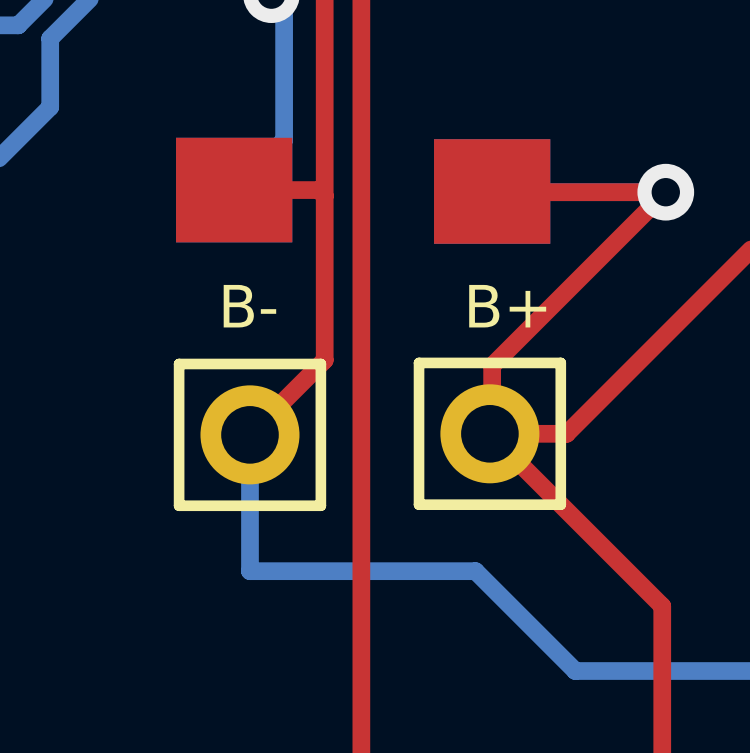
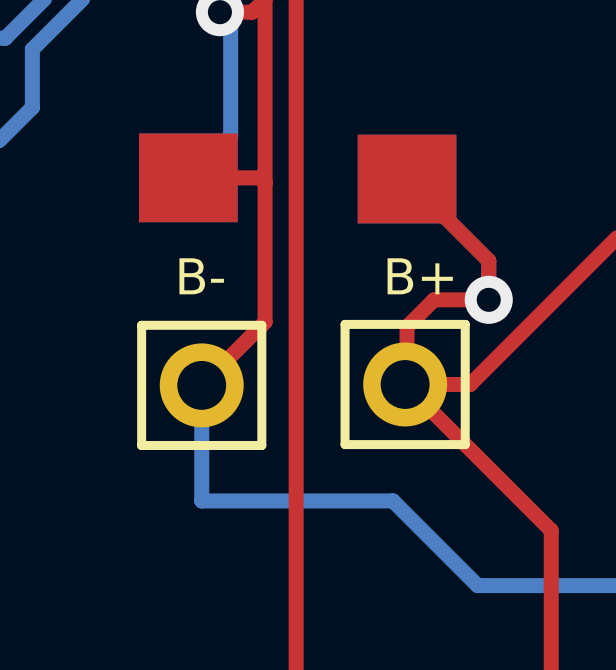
top track: (492, 192) (665, 192) (524, 333) -> (407, 179) (488, 260) (488, 299) (434, 299)
via position: (665, 192) -> (488, 299)

